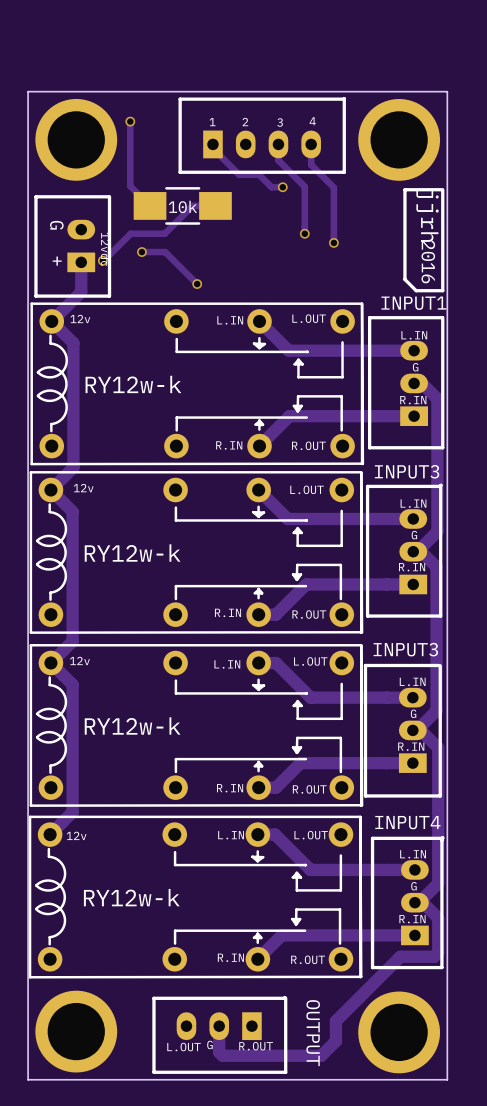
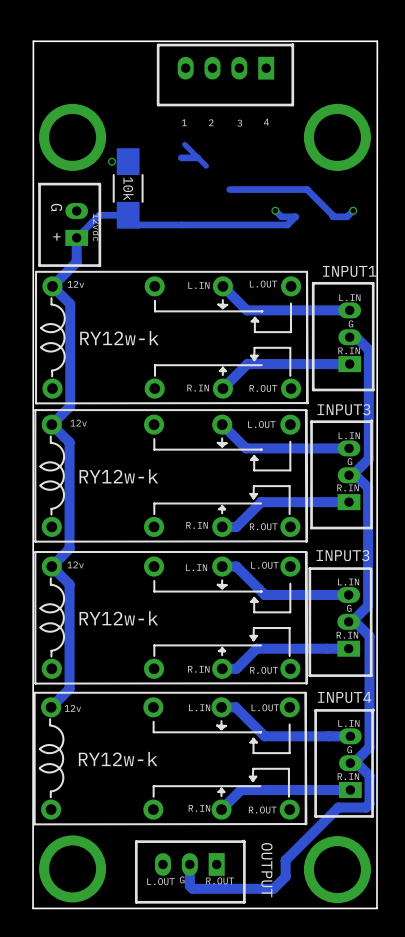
line: (344, 98) (180, 99) (180, 172) (344, 172) (344, 98) -> (292, 44) (158, 45) (158, 105) (292, 105) (292, 44)
track: (130, 121) (130, 186) (150, 205) -> none
via: (130, 121) -> none
part rotation: 0° (262, 144) -> 180° (225, 68)
part position: (262, 144) -> (225, 68)
track: (278, 144) (278, 160) (304, 186) (304, 233) -> none
track: (311, 144) (311, 164) (333, 187) (333, 242) -> none
track: none -> (198, 157) (181, 157)
via: none -> (112, 161)
track: (239, 174) (259, 174) (271, 187) (282, 187) -> none
via: (282, 187) -> none
line: (442, 189) (404, 189) (404, 279) (416, 290) (442, 290) (442, 190) -> none
track: none -> (229, 189) (307, 189) (333, 216) (347, 216) (353, 210)
part rotation: 0° (182, 205) -> 90° clockwise (128, 188)
track: (215, 205) (192, 205) (164, 233) (130, 233) (102, 260) -> none
text: jjrh (427, 215) -> none
track: none -> (275, 210) (281, 216) (295, 216) (287, 224) (137, 224) (128, 215) (99, 215) (76, 237)
via: none -> (275, 210)
via: none -> (353, 210)
via: (304, 233) -> none
via: (333, 242) -> none
track: (141, 252) (165, 252) (197, 284) -> none
via: (141, 252) -> none
via: (102, 260) -> none
text: 2016 (428, 262) -> none
via: (197, 284) -> none
board edge: (447, 1079) (447, 91) (28, 91) (28, 1079) -> (376, 908) (377, 41) (33, 41) (33, 908)

